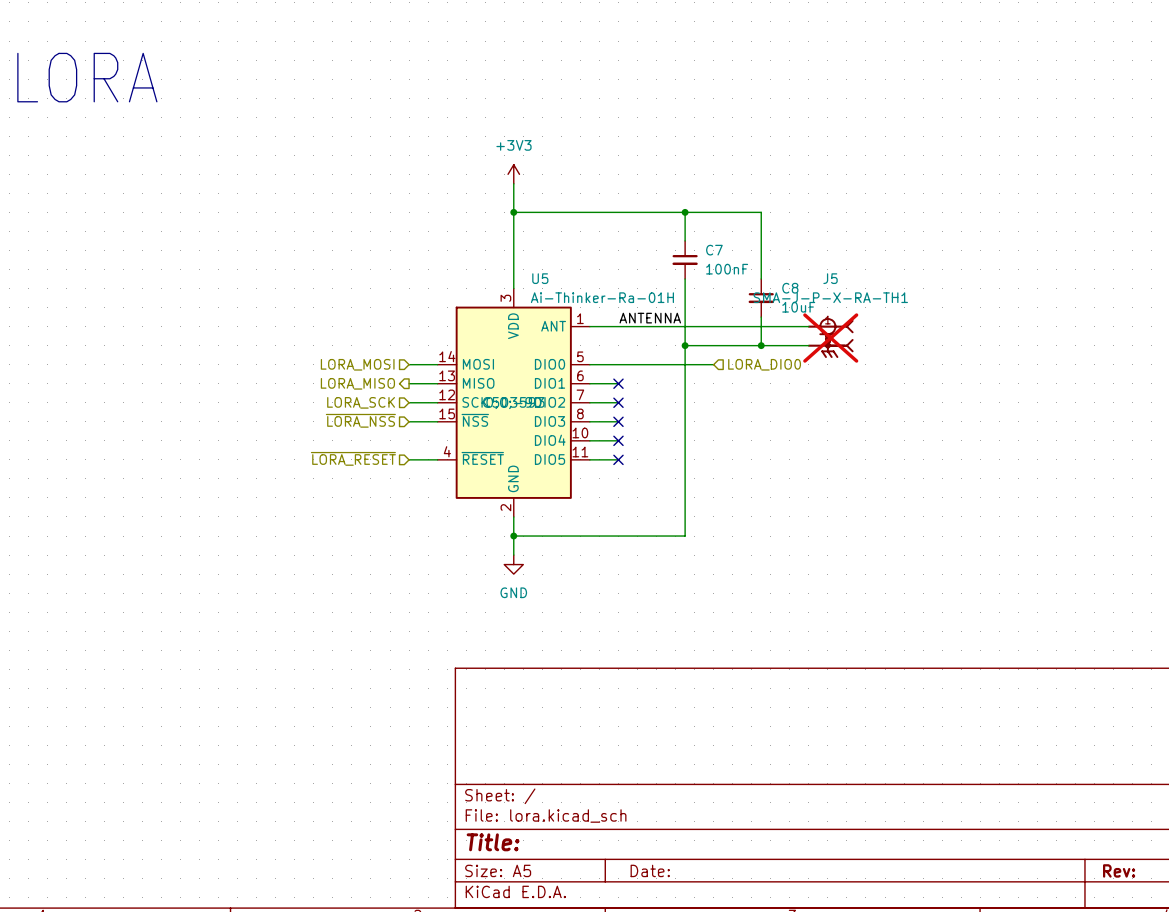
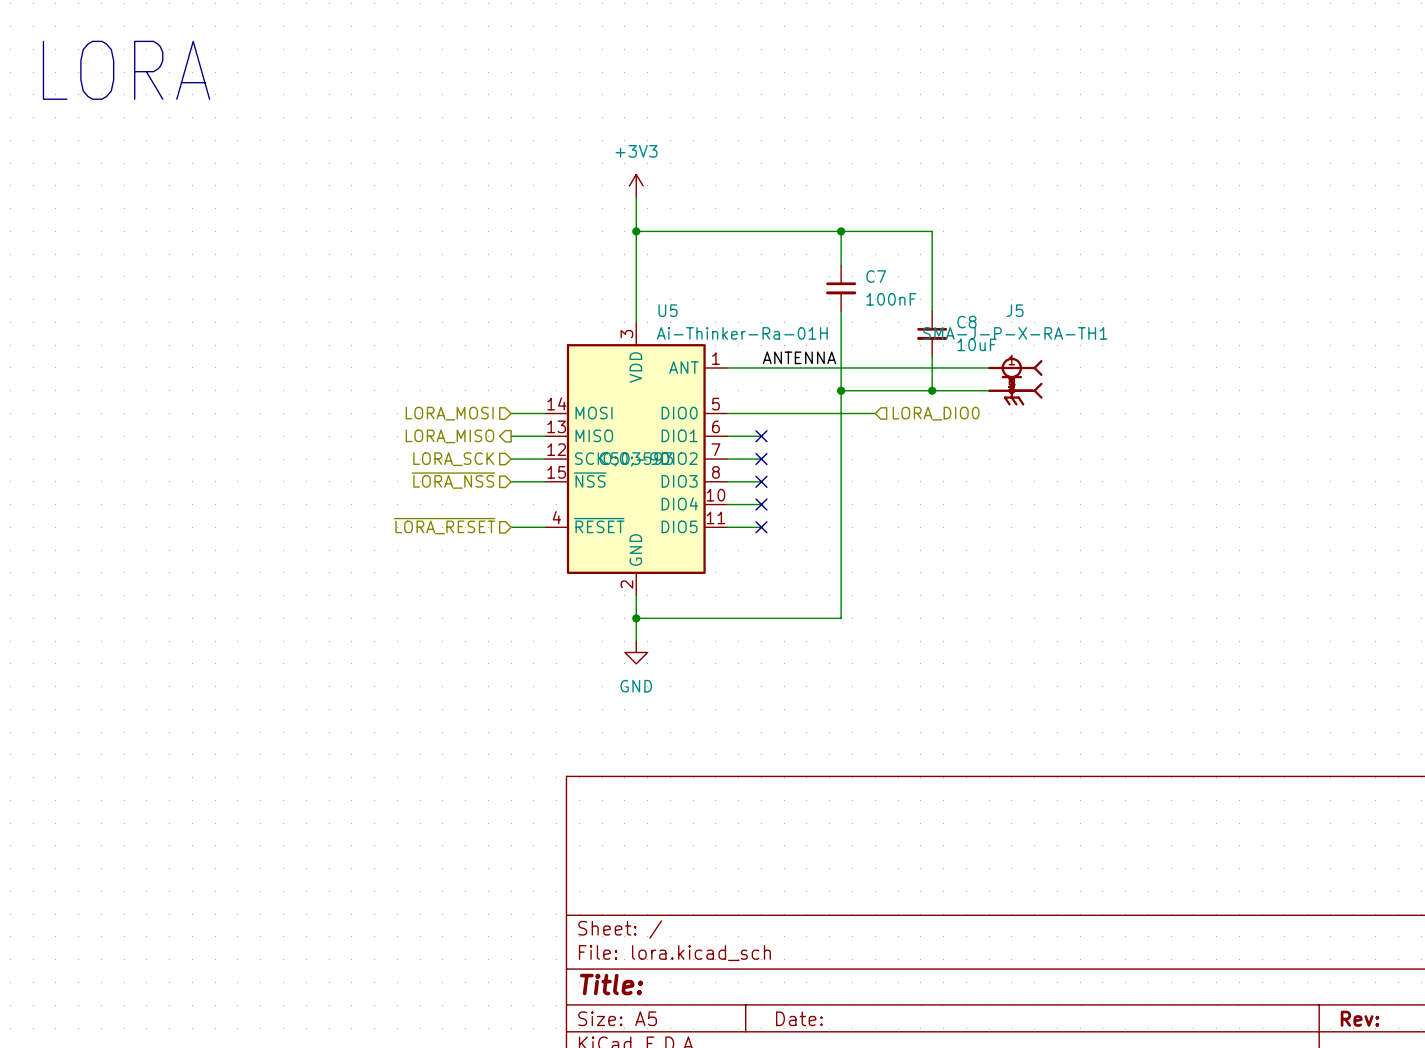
J5 do-not-place cross: (830, 338) -> none

